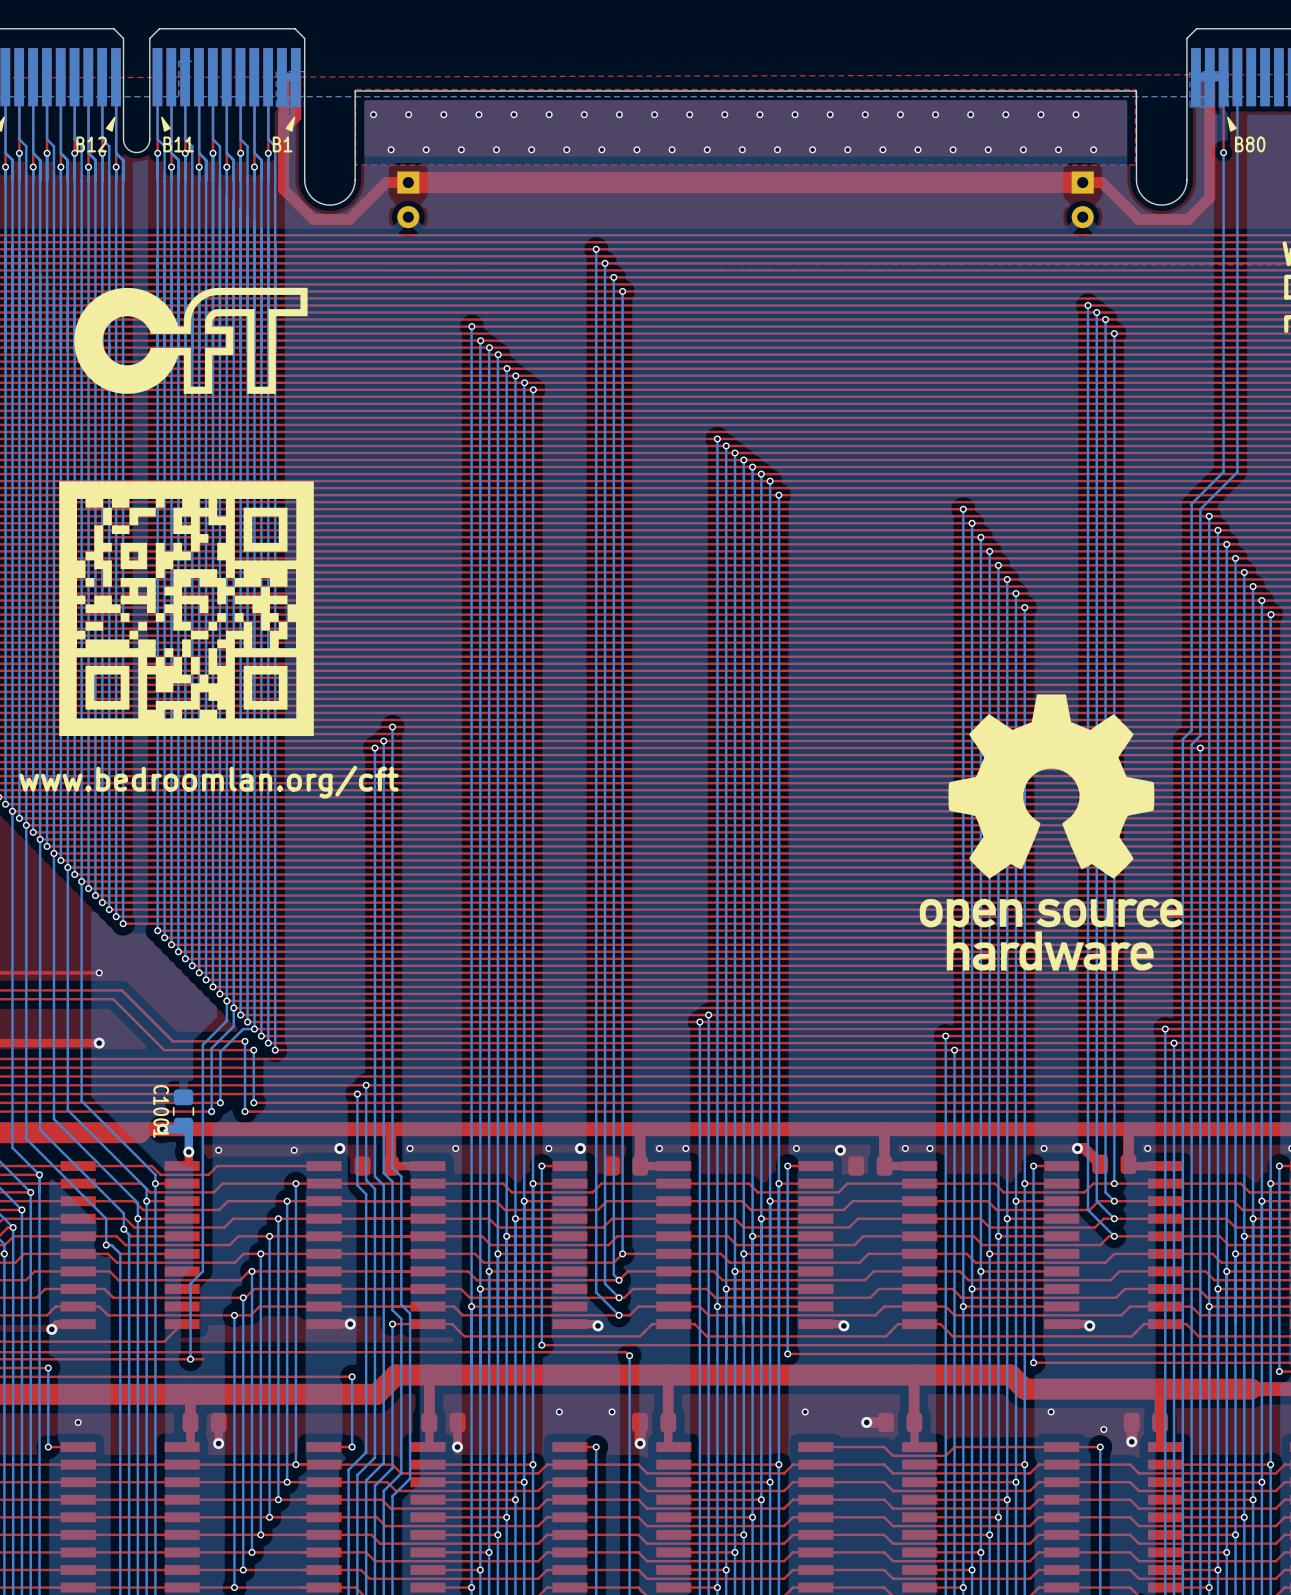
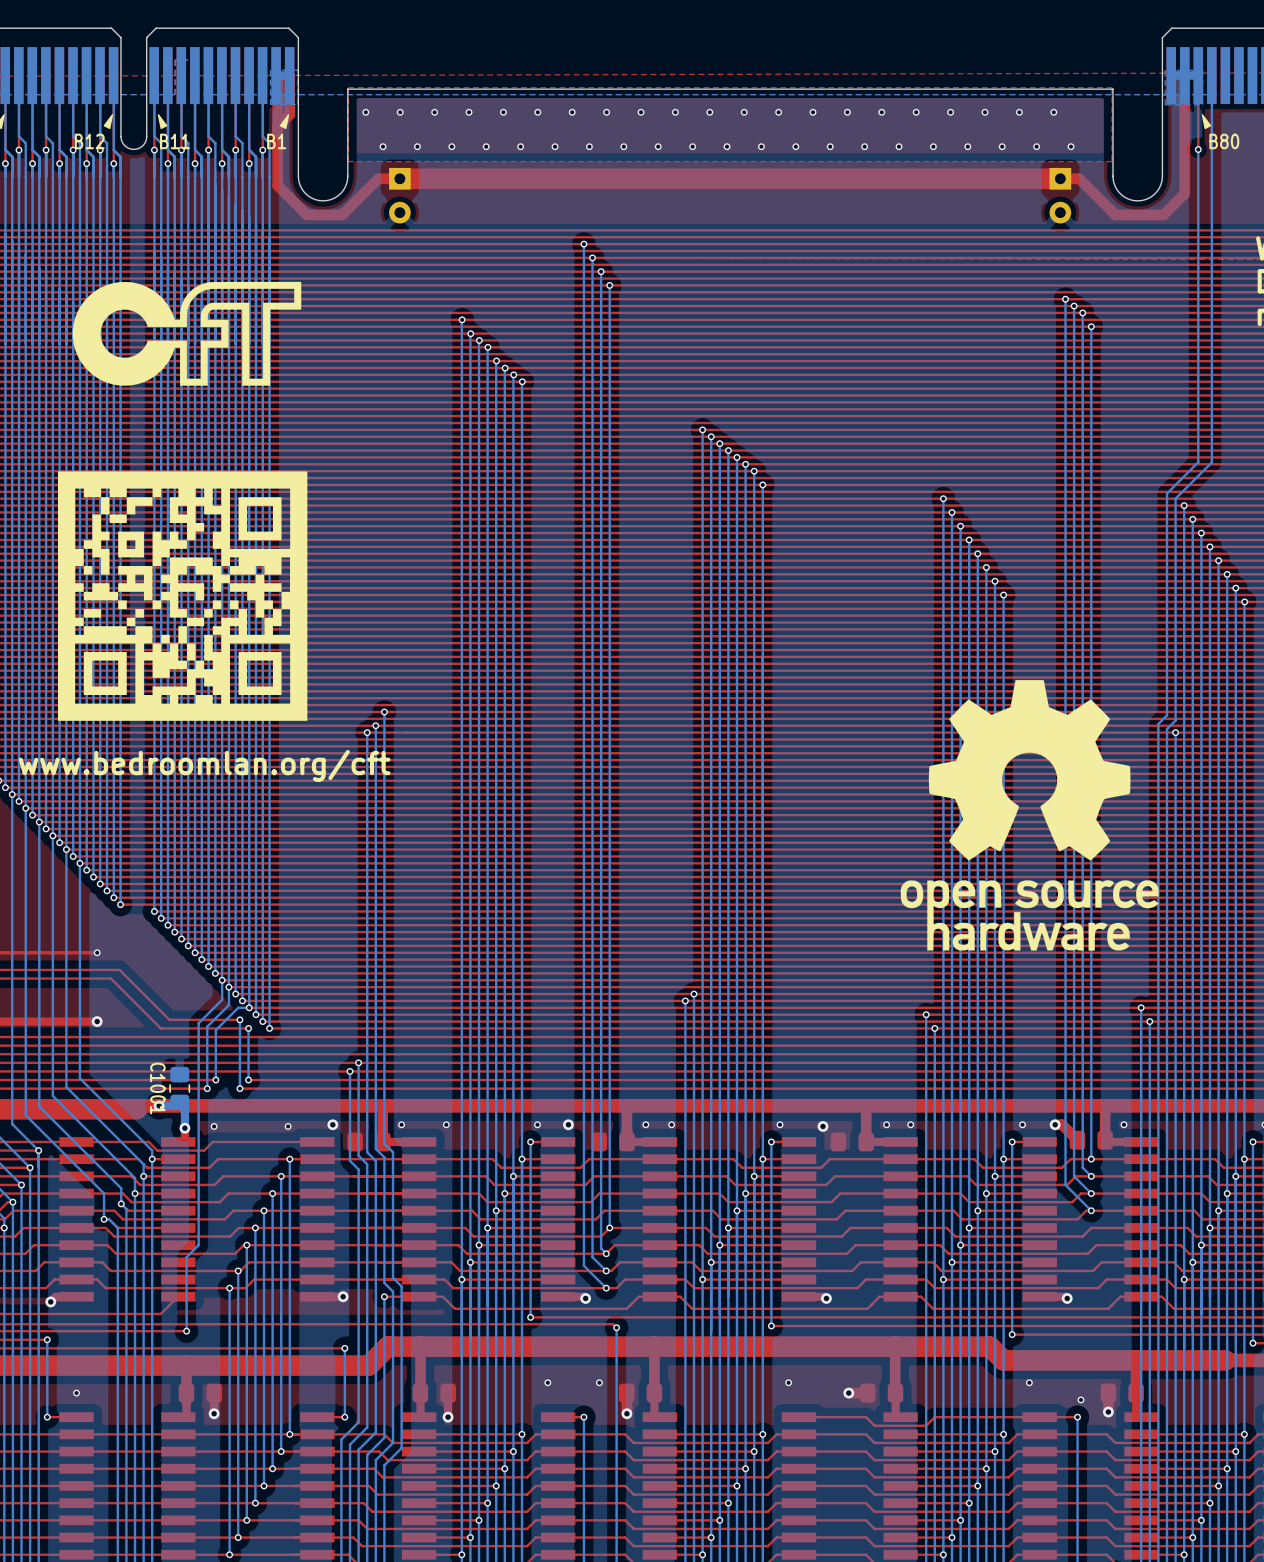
top track: (202, 1359) (190, 1359) -> none

